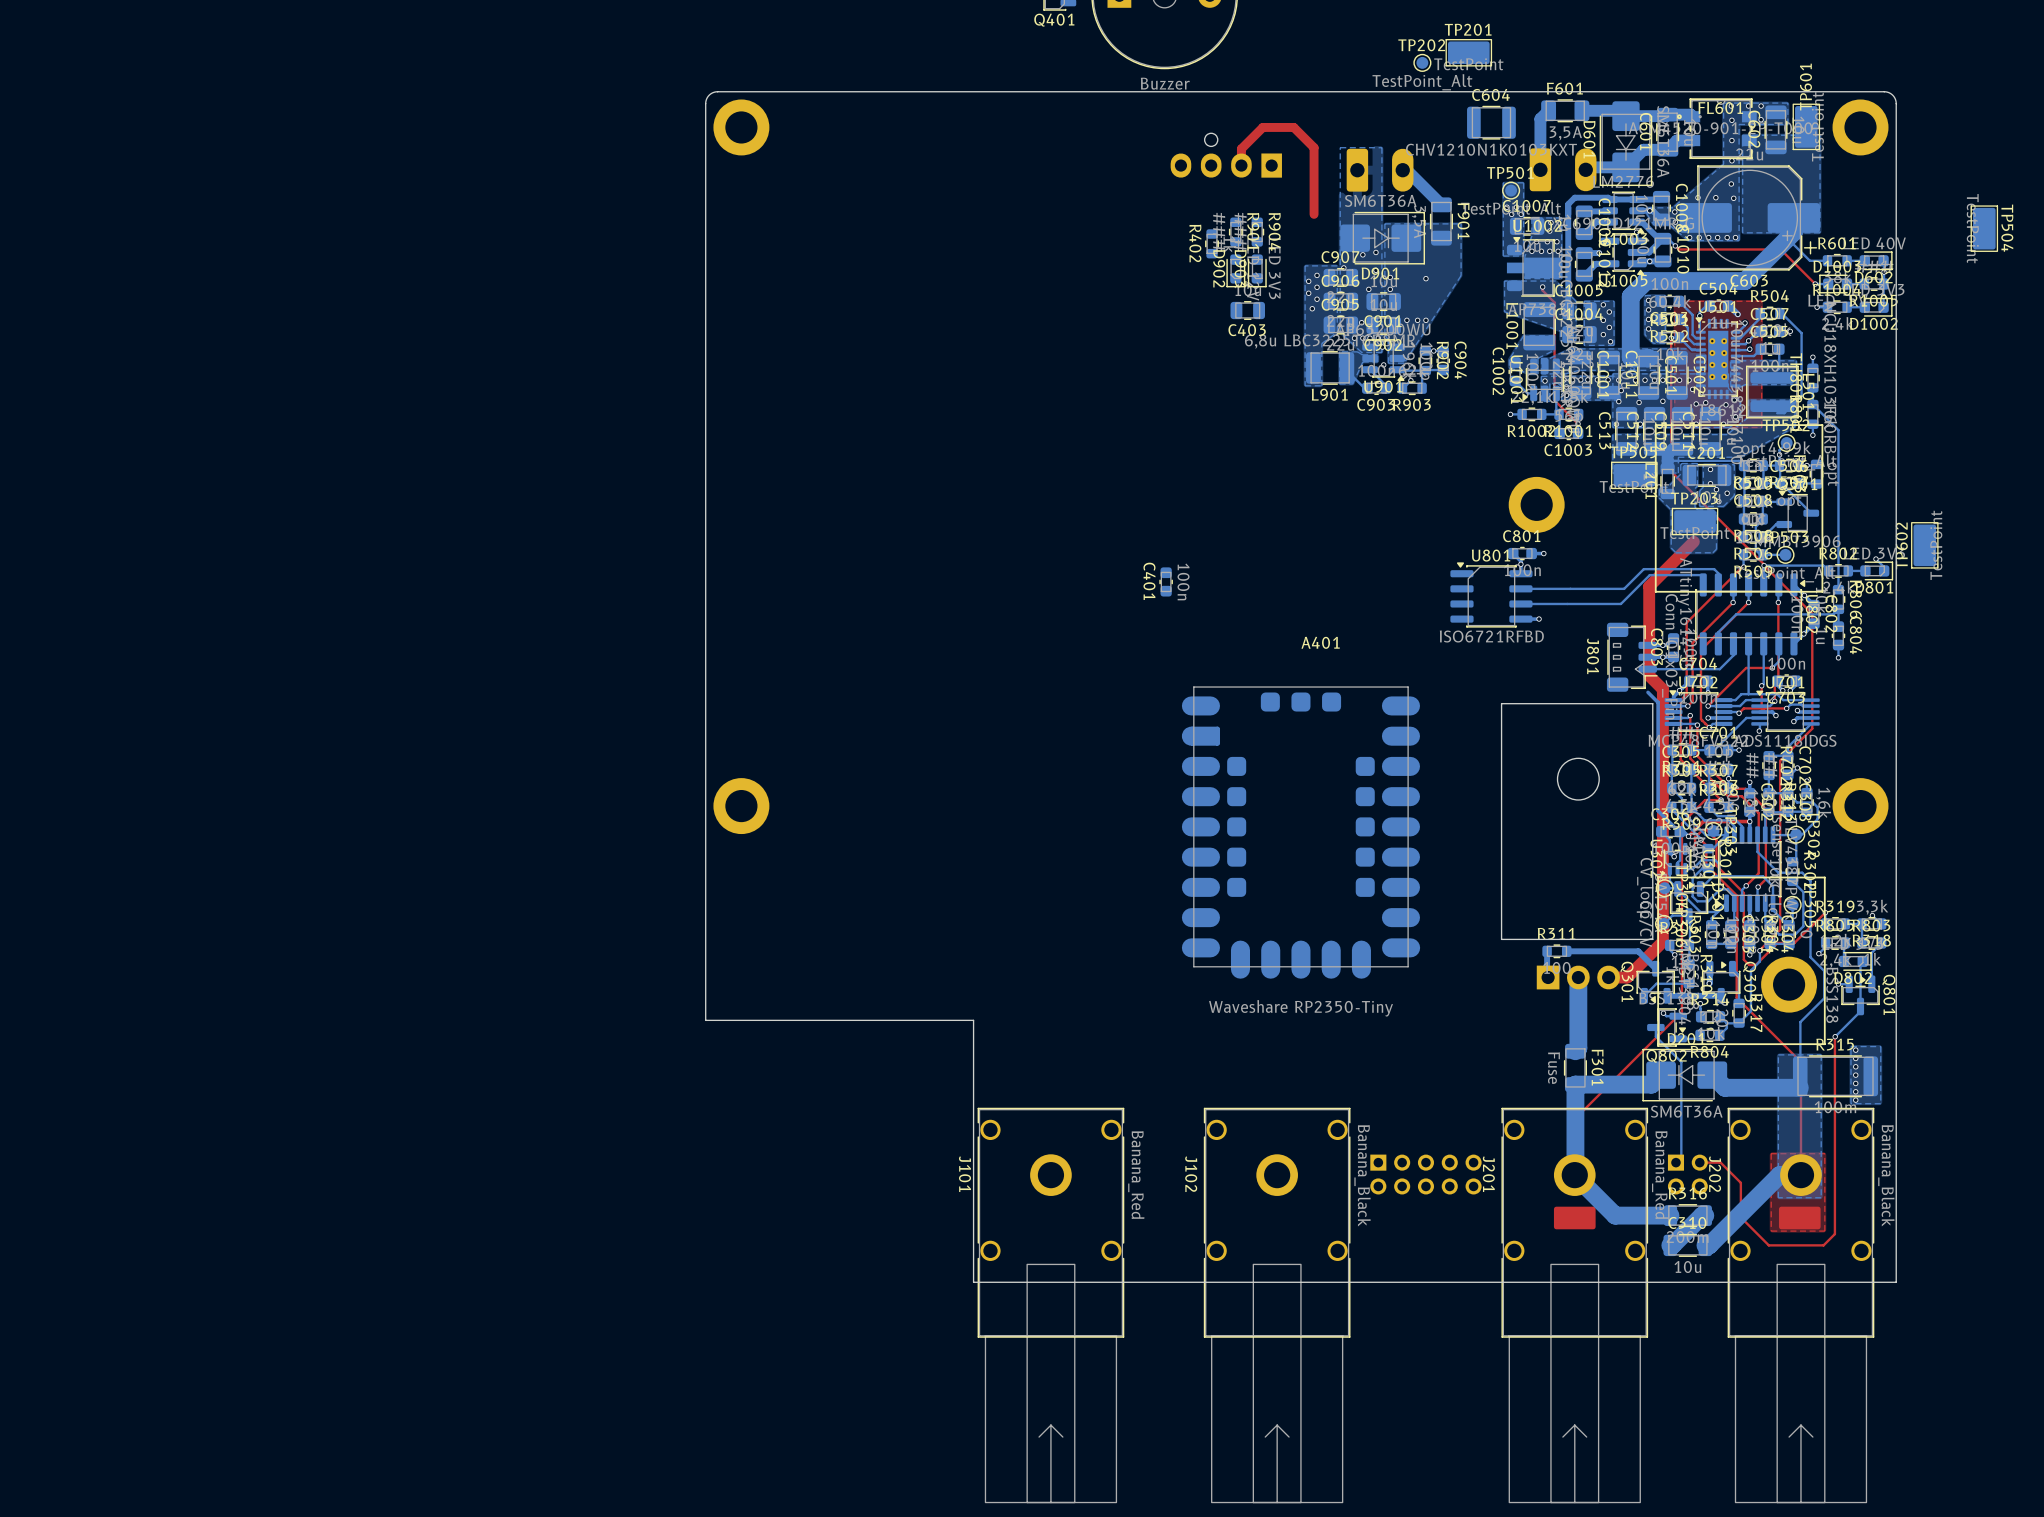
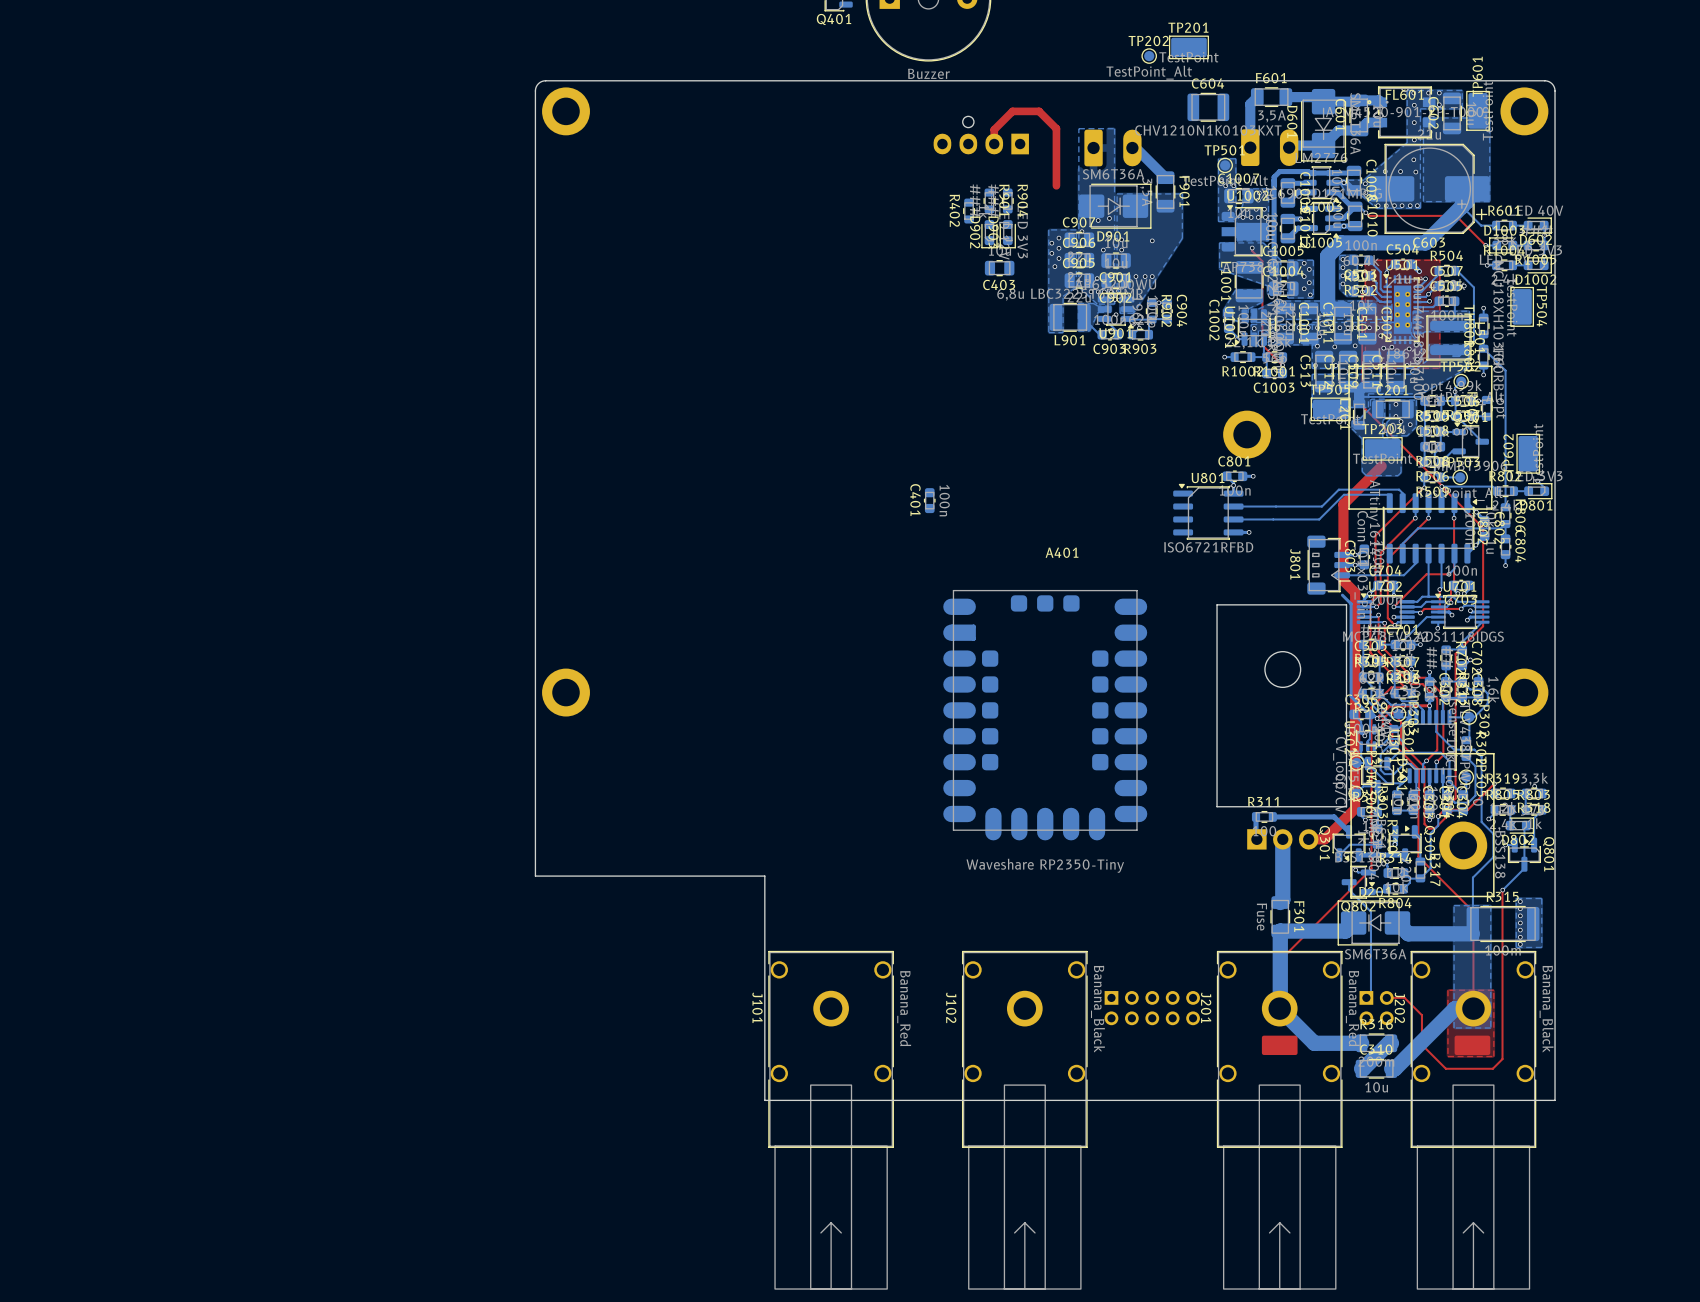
TP504 position: (1984, 228) -> (1522, 306)
TP602 position: (1924, 545) -> (1528, 453)

